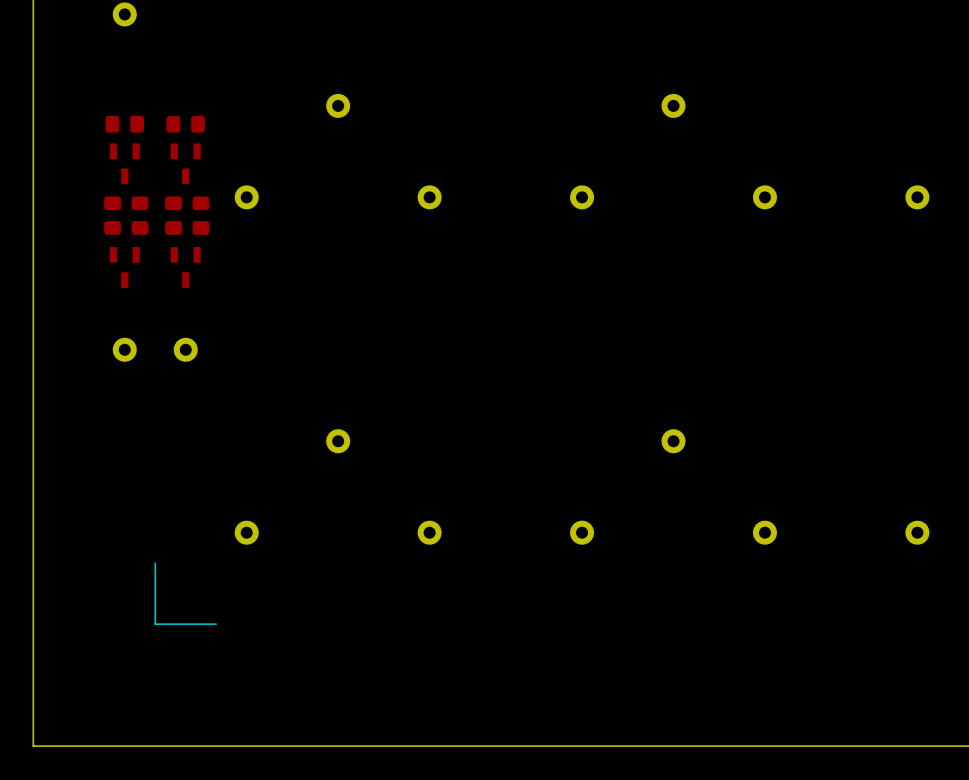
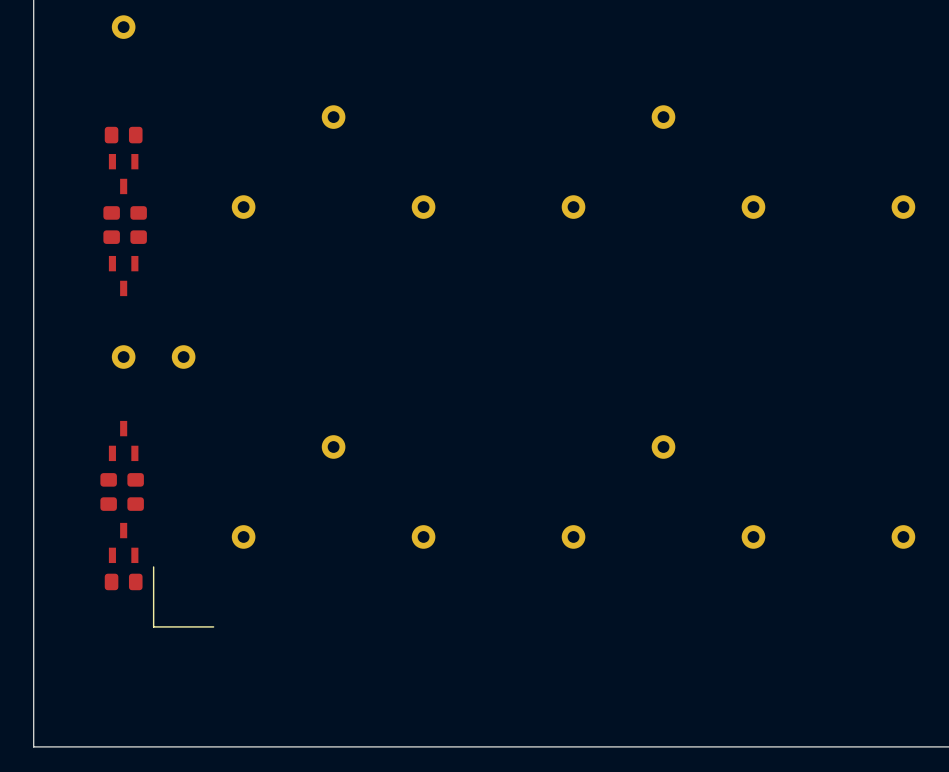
part: (185, 124) -> none
part: (185, 163) -> none
part: (173, 215) -> none
part: (200, 215) -> none
part: (185, 267) -> none
part: none -> (123, 440)
part: none -> (108, 491)
part: none -> (135, 491)
part: none -> (123, 542)
part: none -> (123, 581)

